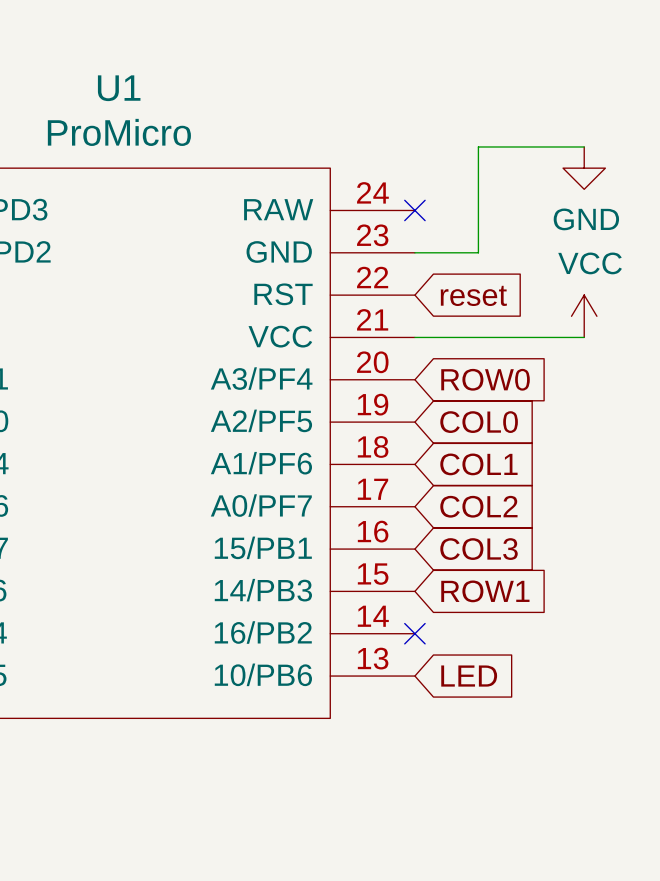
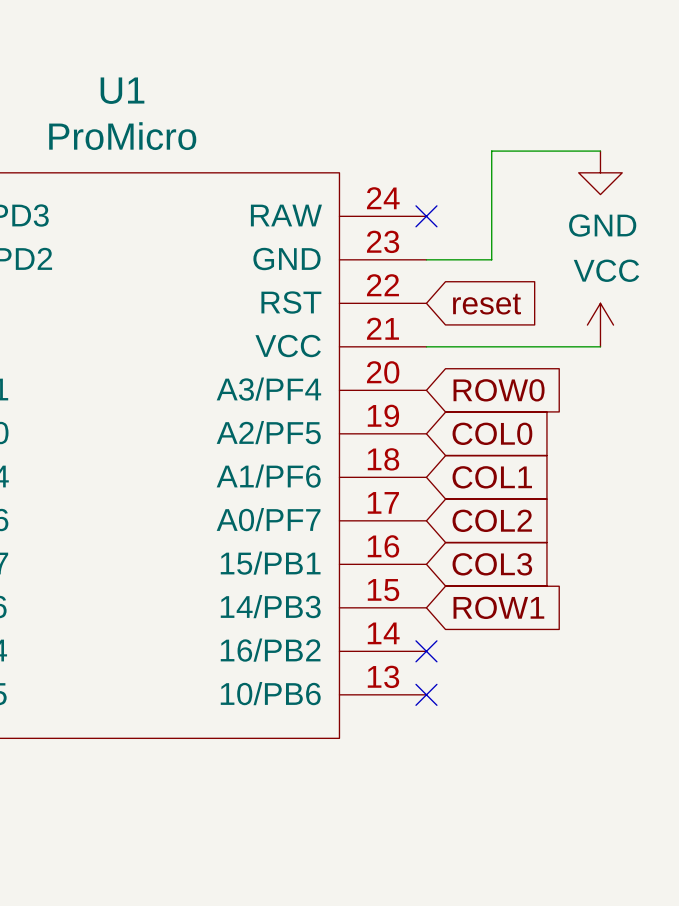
no-connect mark: none -> (426, 694)
global label: LED (469, 676) -> none

